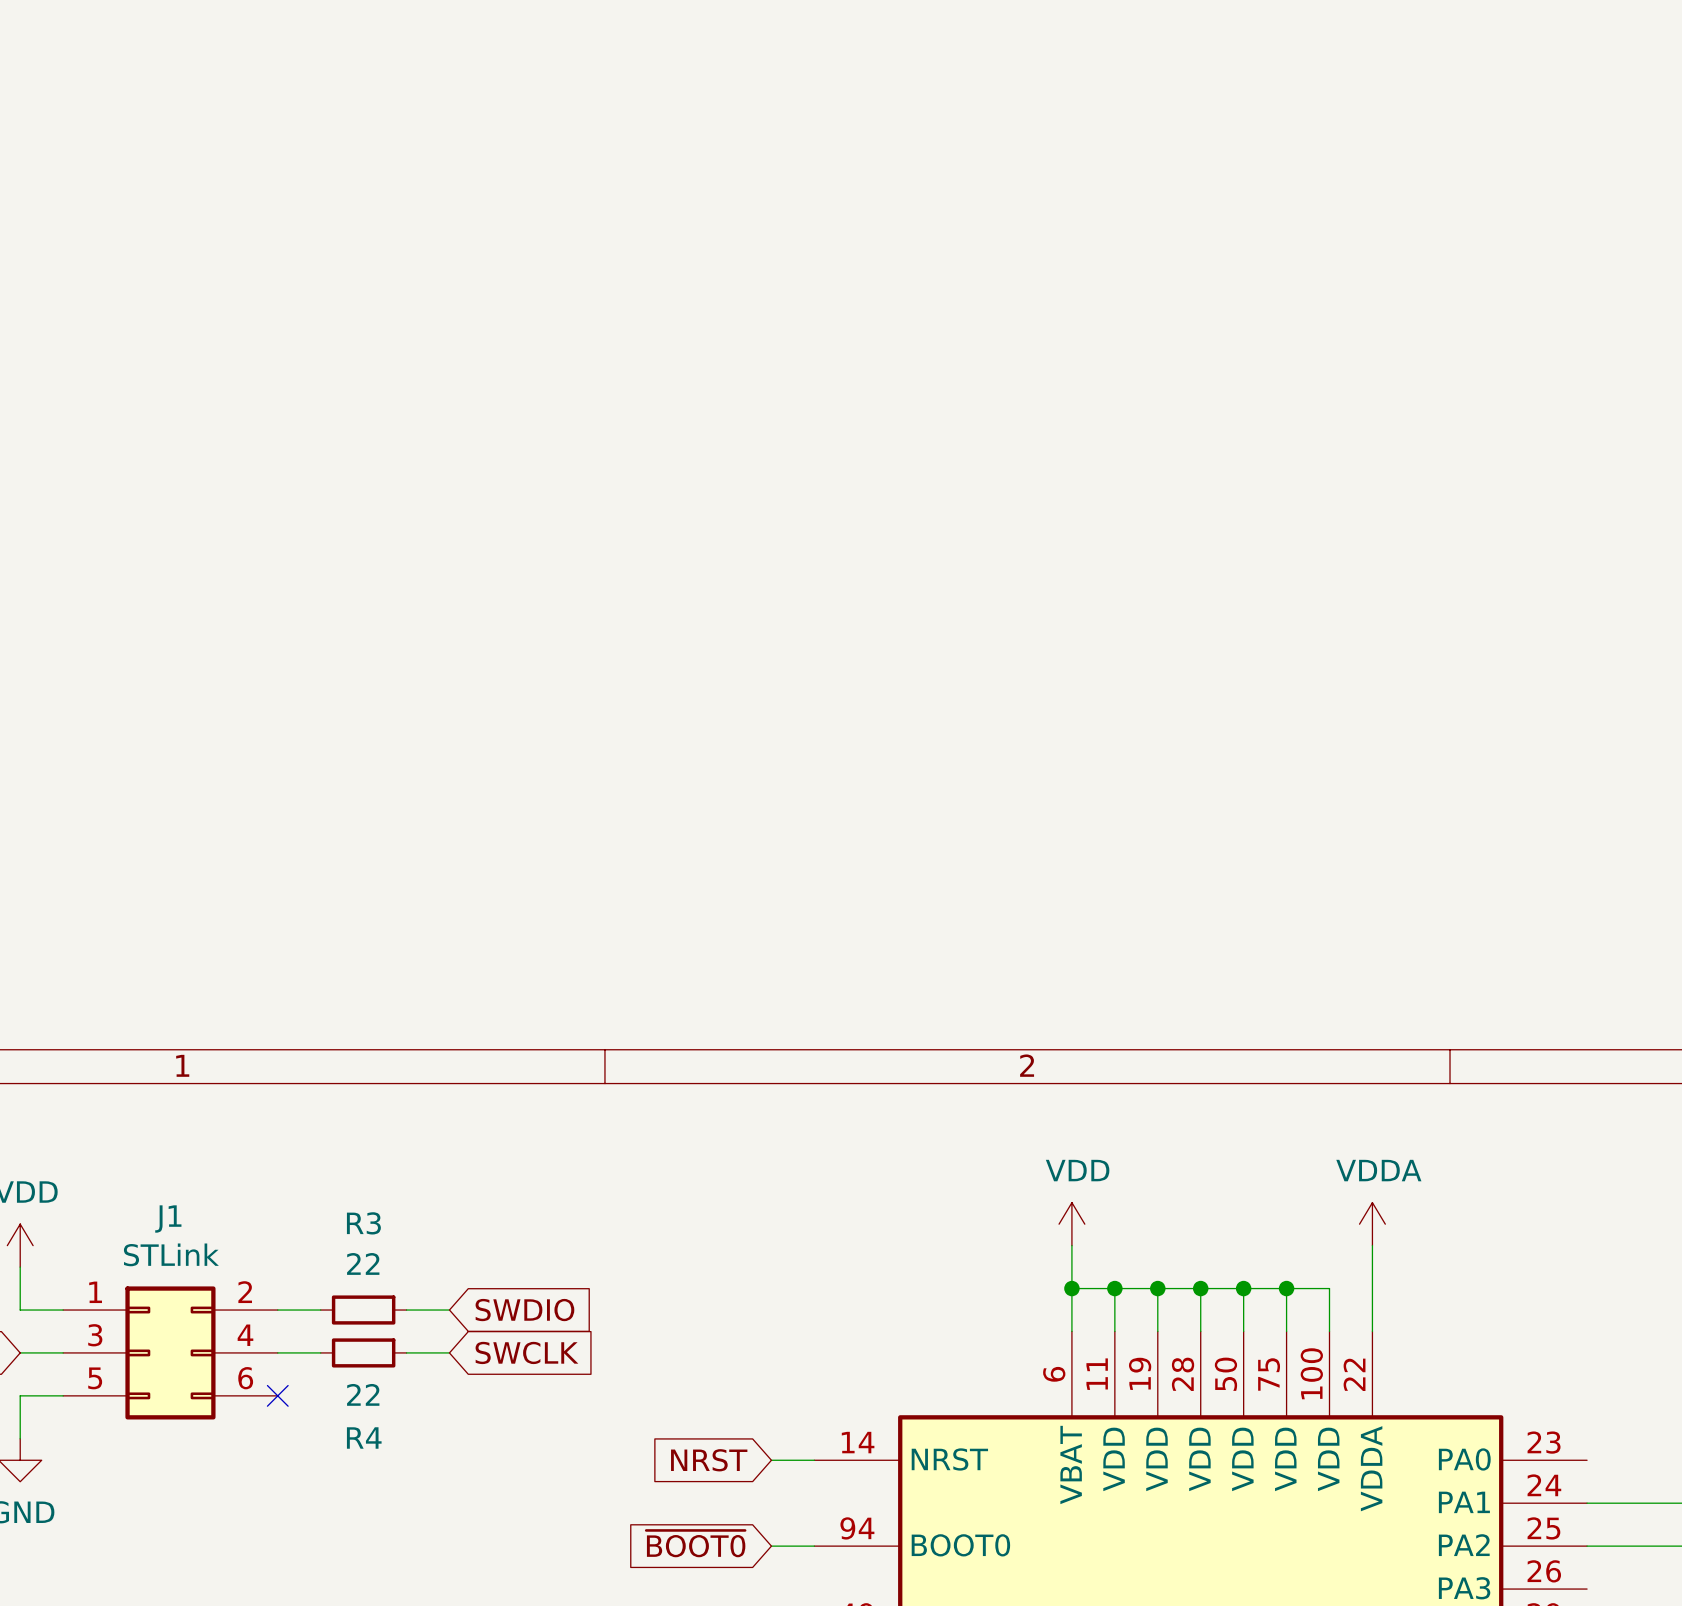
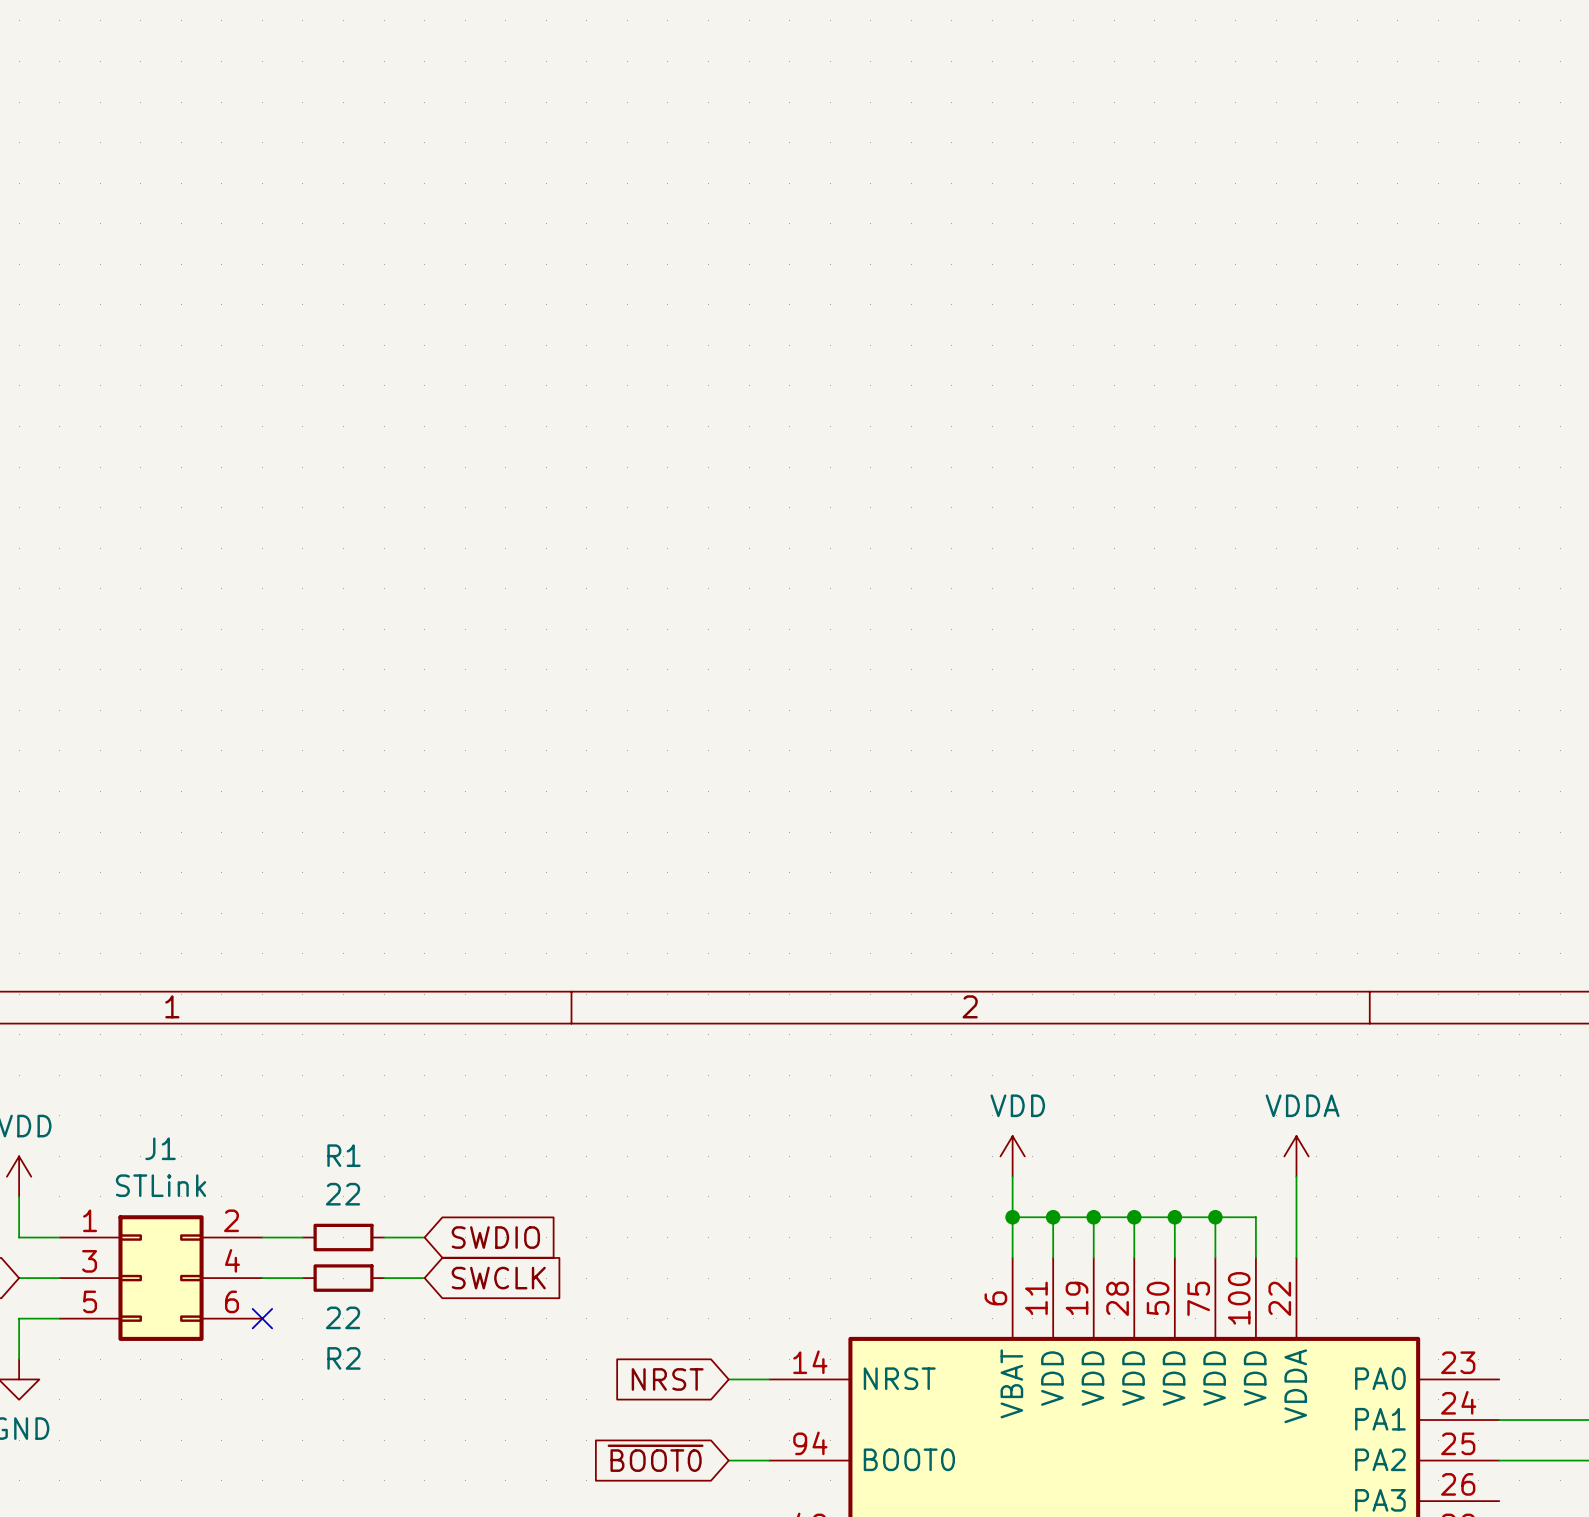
R3 name: R3 (363, 1223) -> R1 (343, 1155)
R4 name: R4 (364, 1438) -> R2 (343, 1358)

